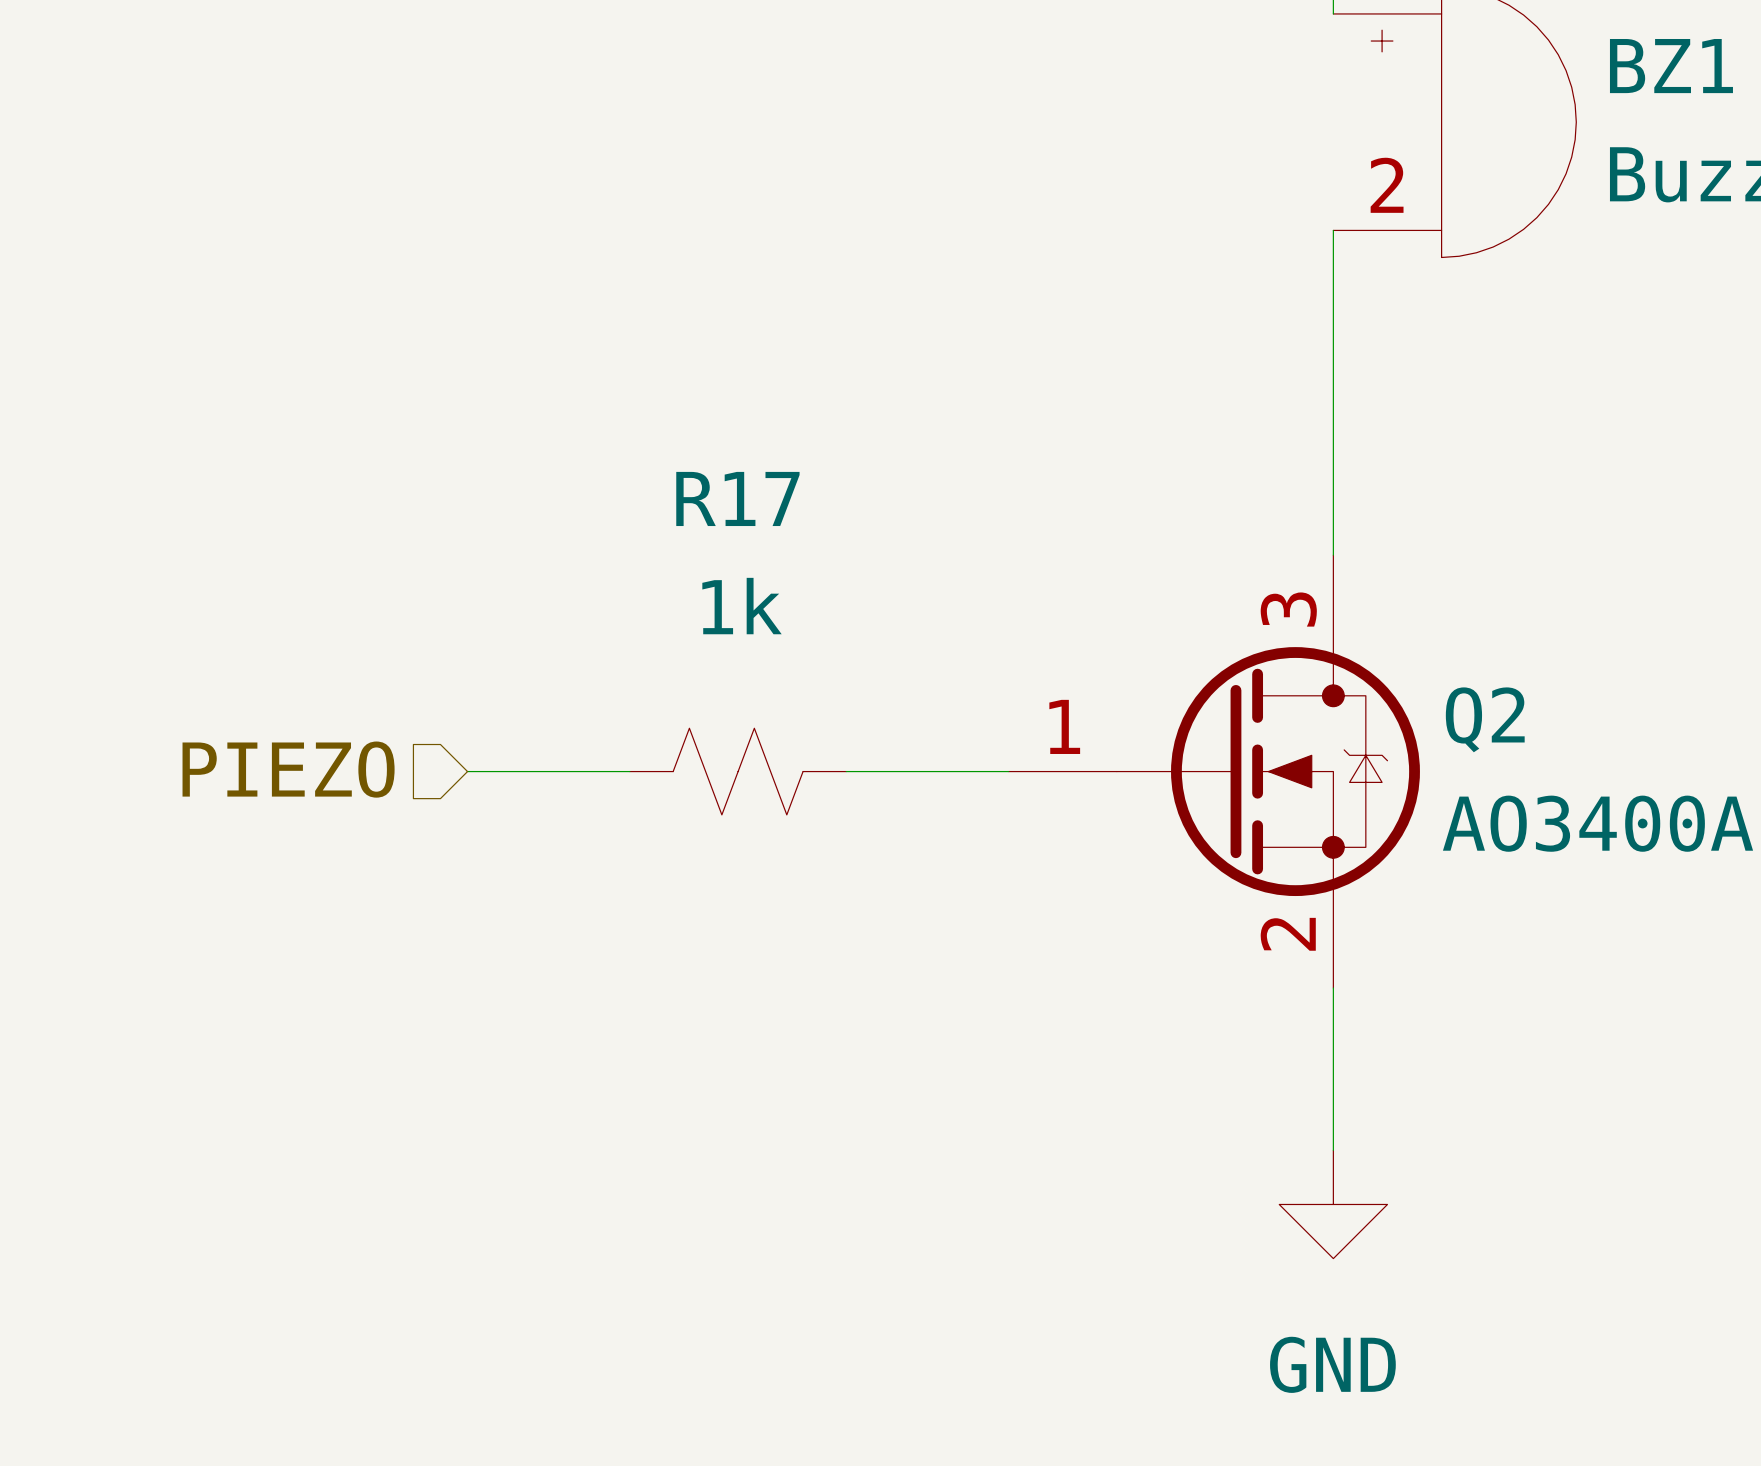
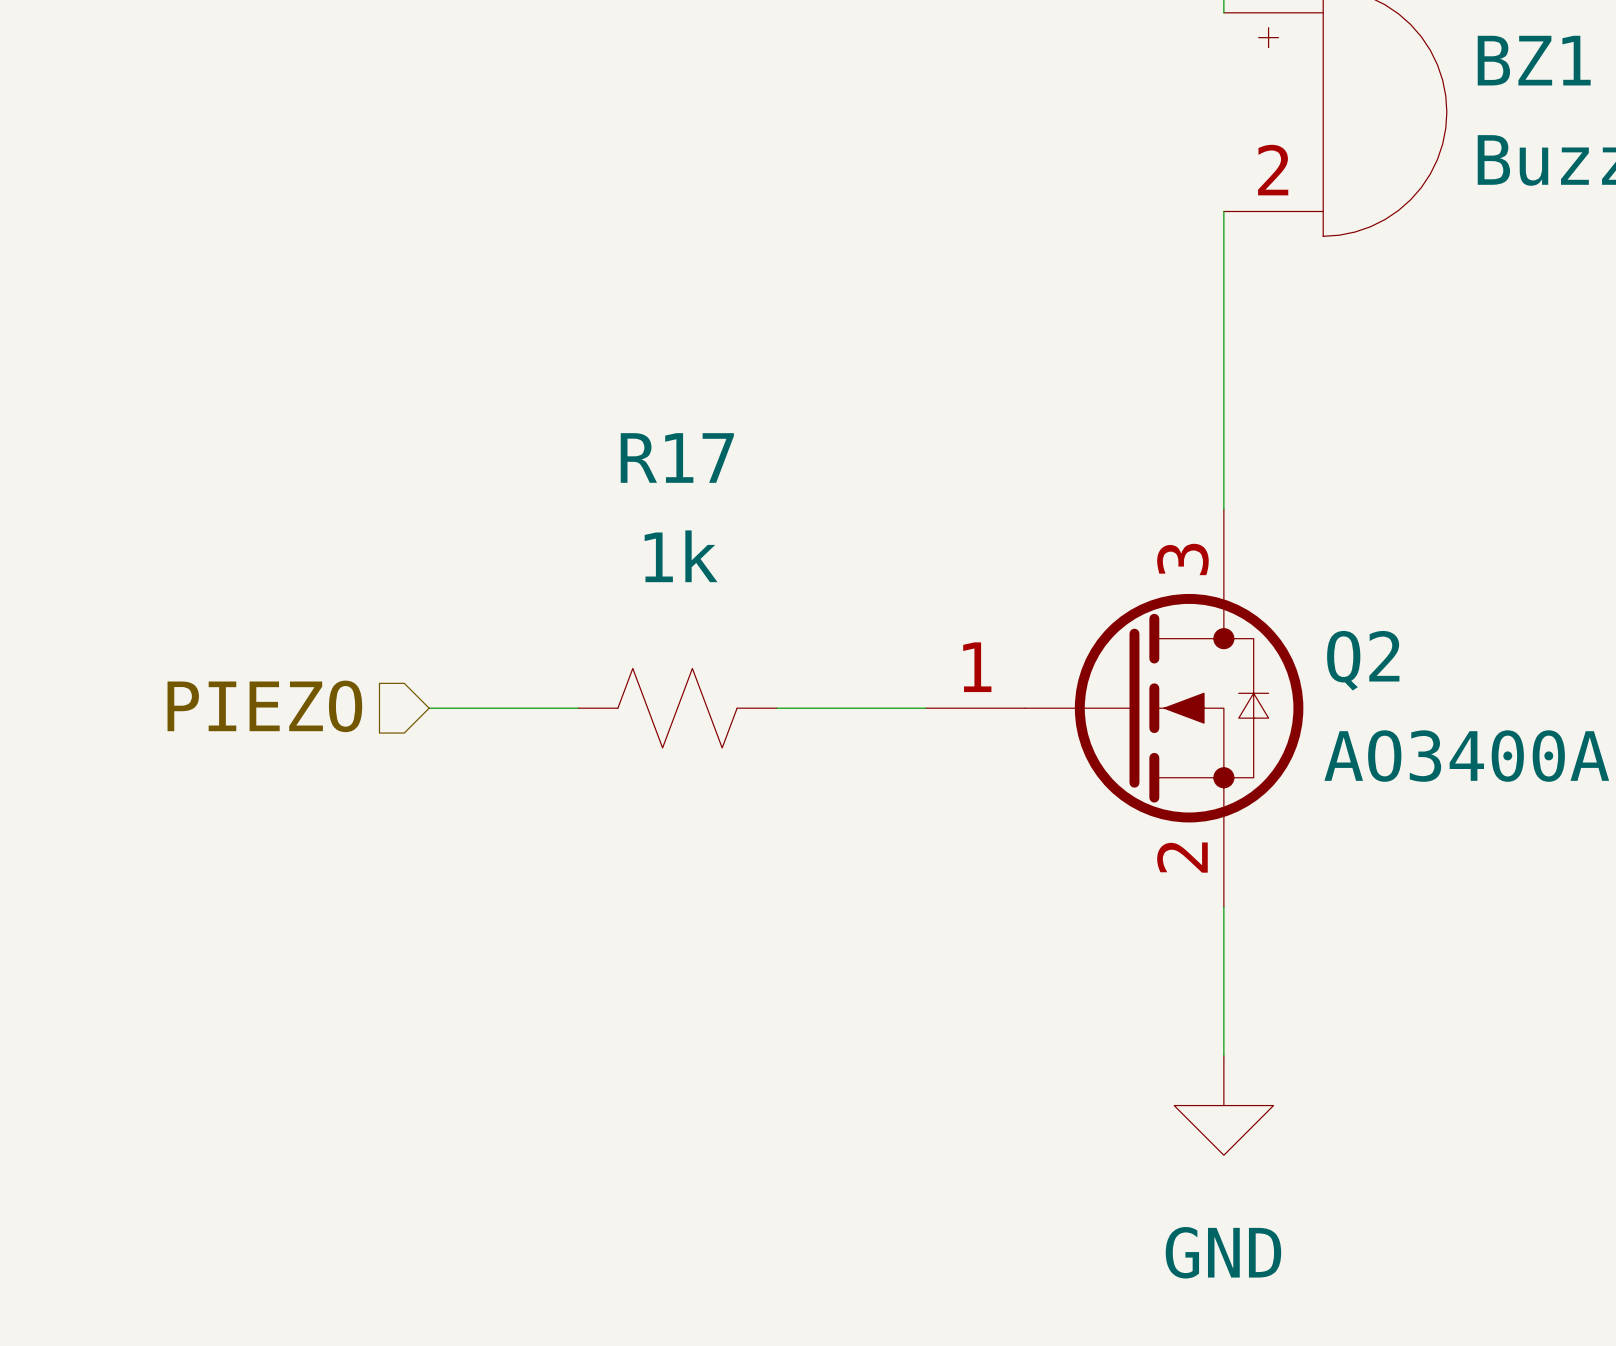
Q2 symbol: [1008, 555, 1420, 989] -> [925, 509, 1304, 907]

